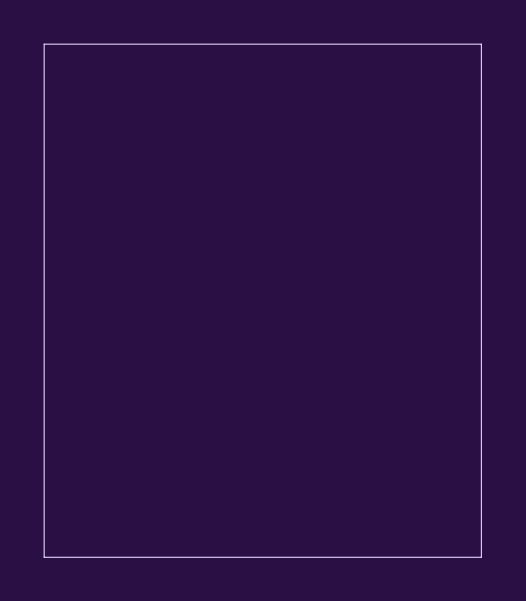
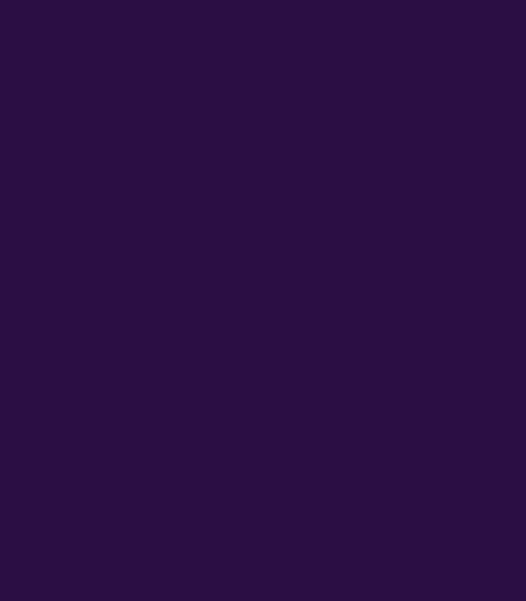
board edge: (44, 44) (481, 44) (481, 557) (44, 557) (44, 44) -> none

